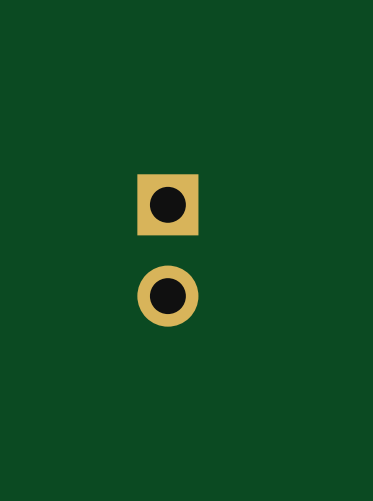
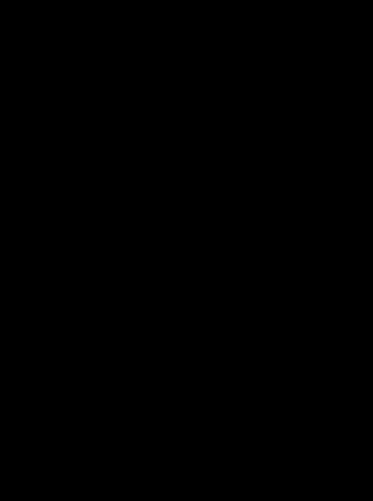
part: (167, 250) -> none

